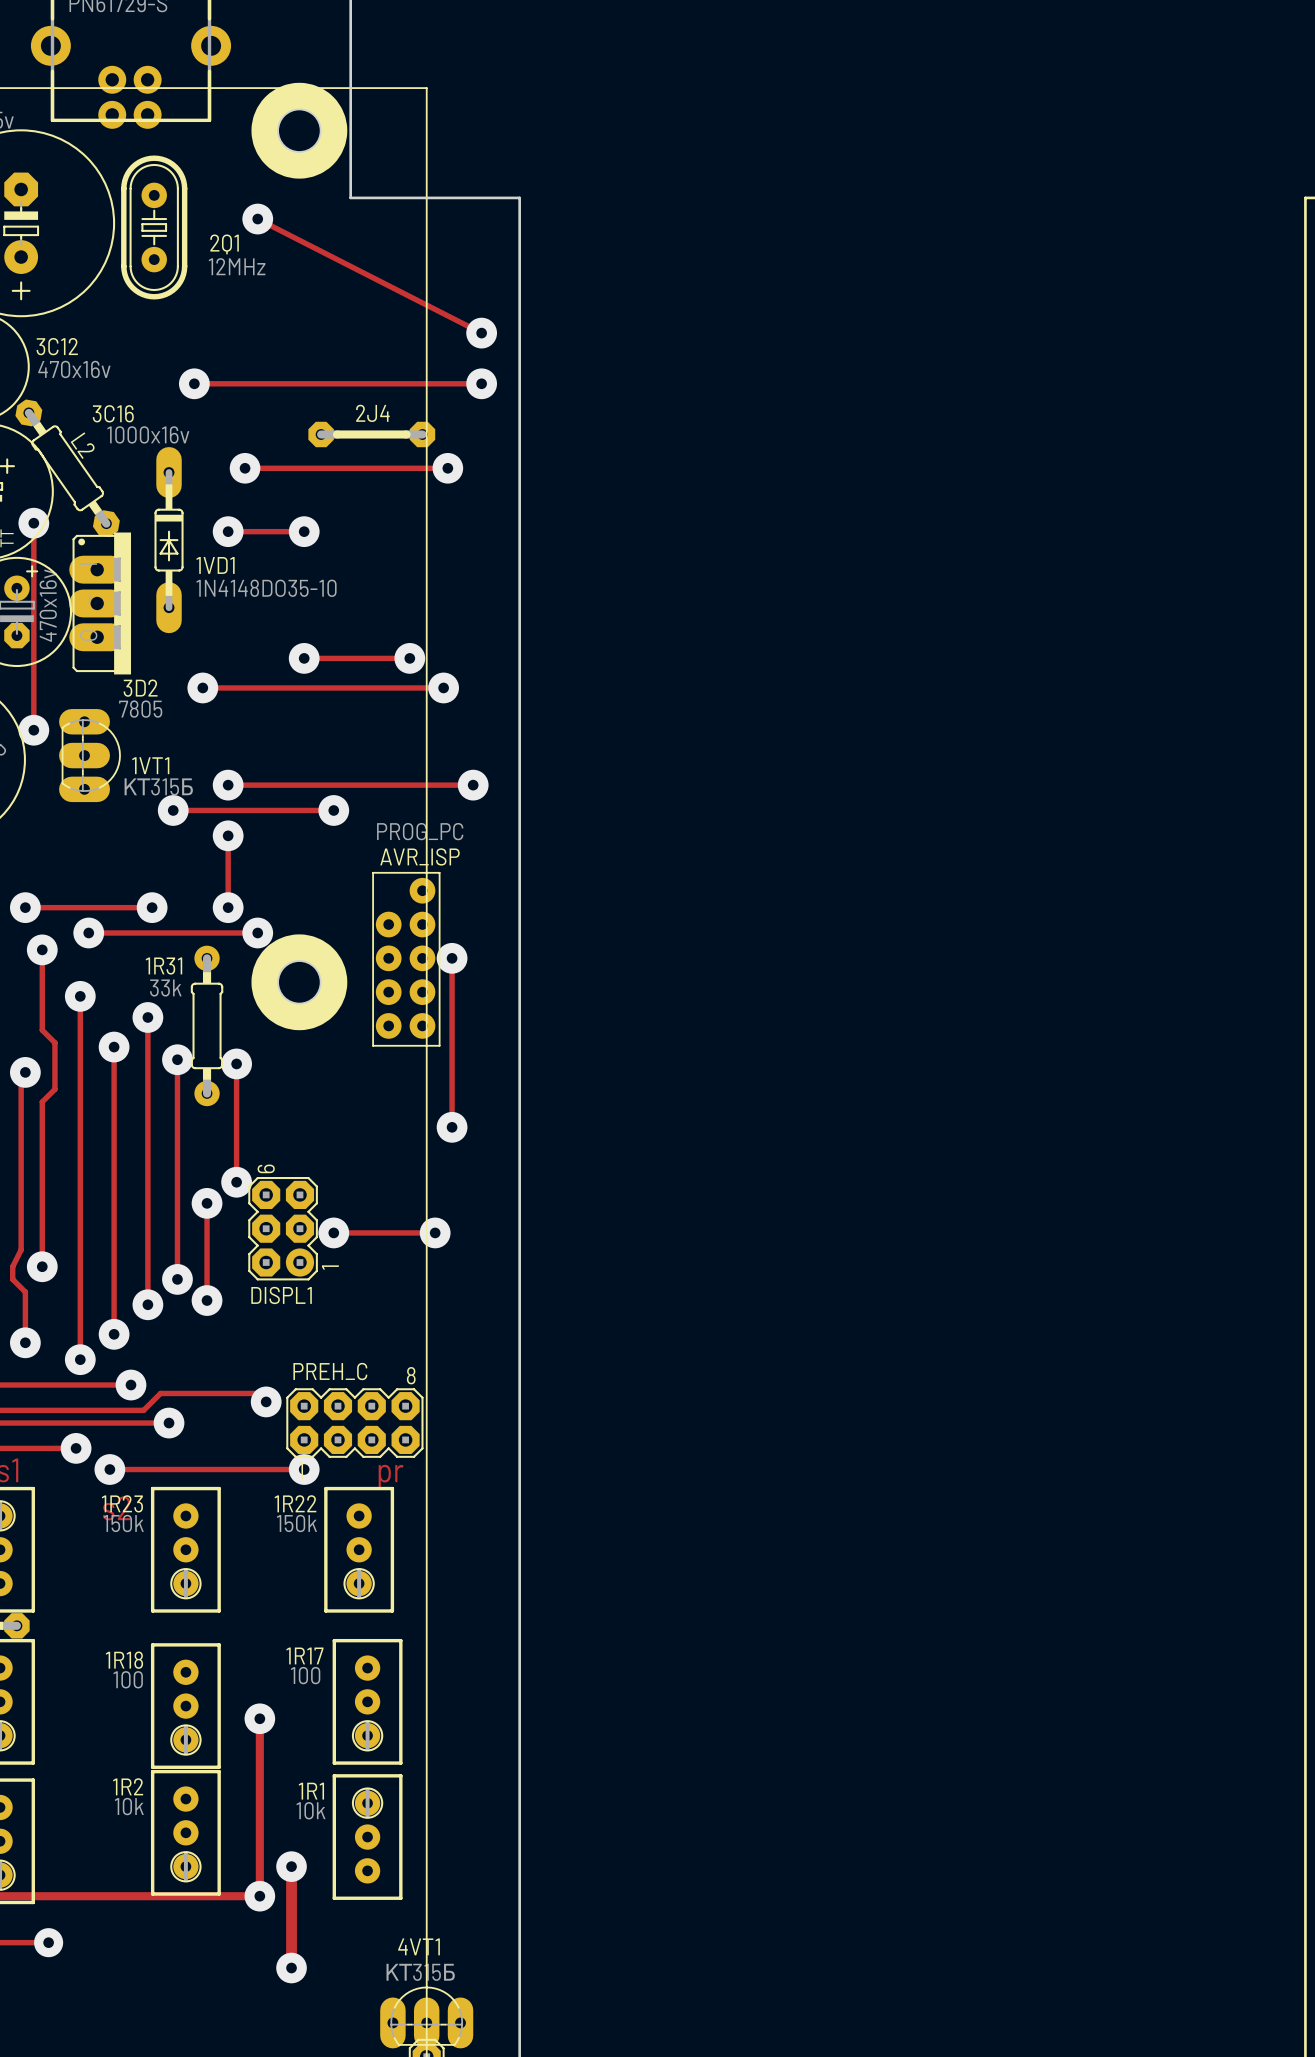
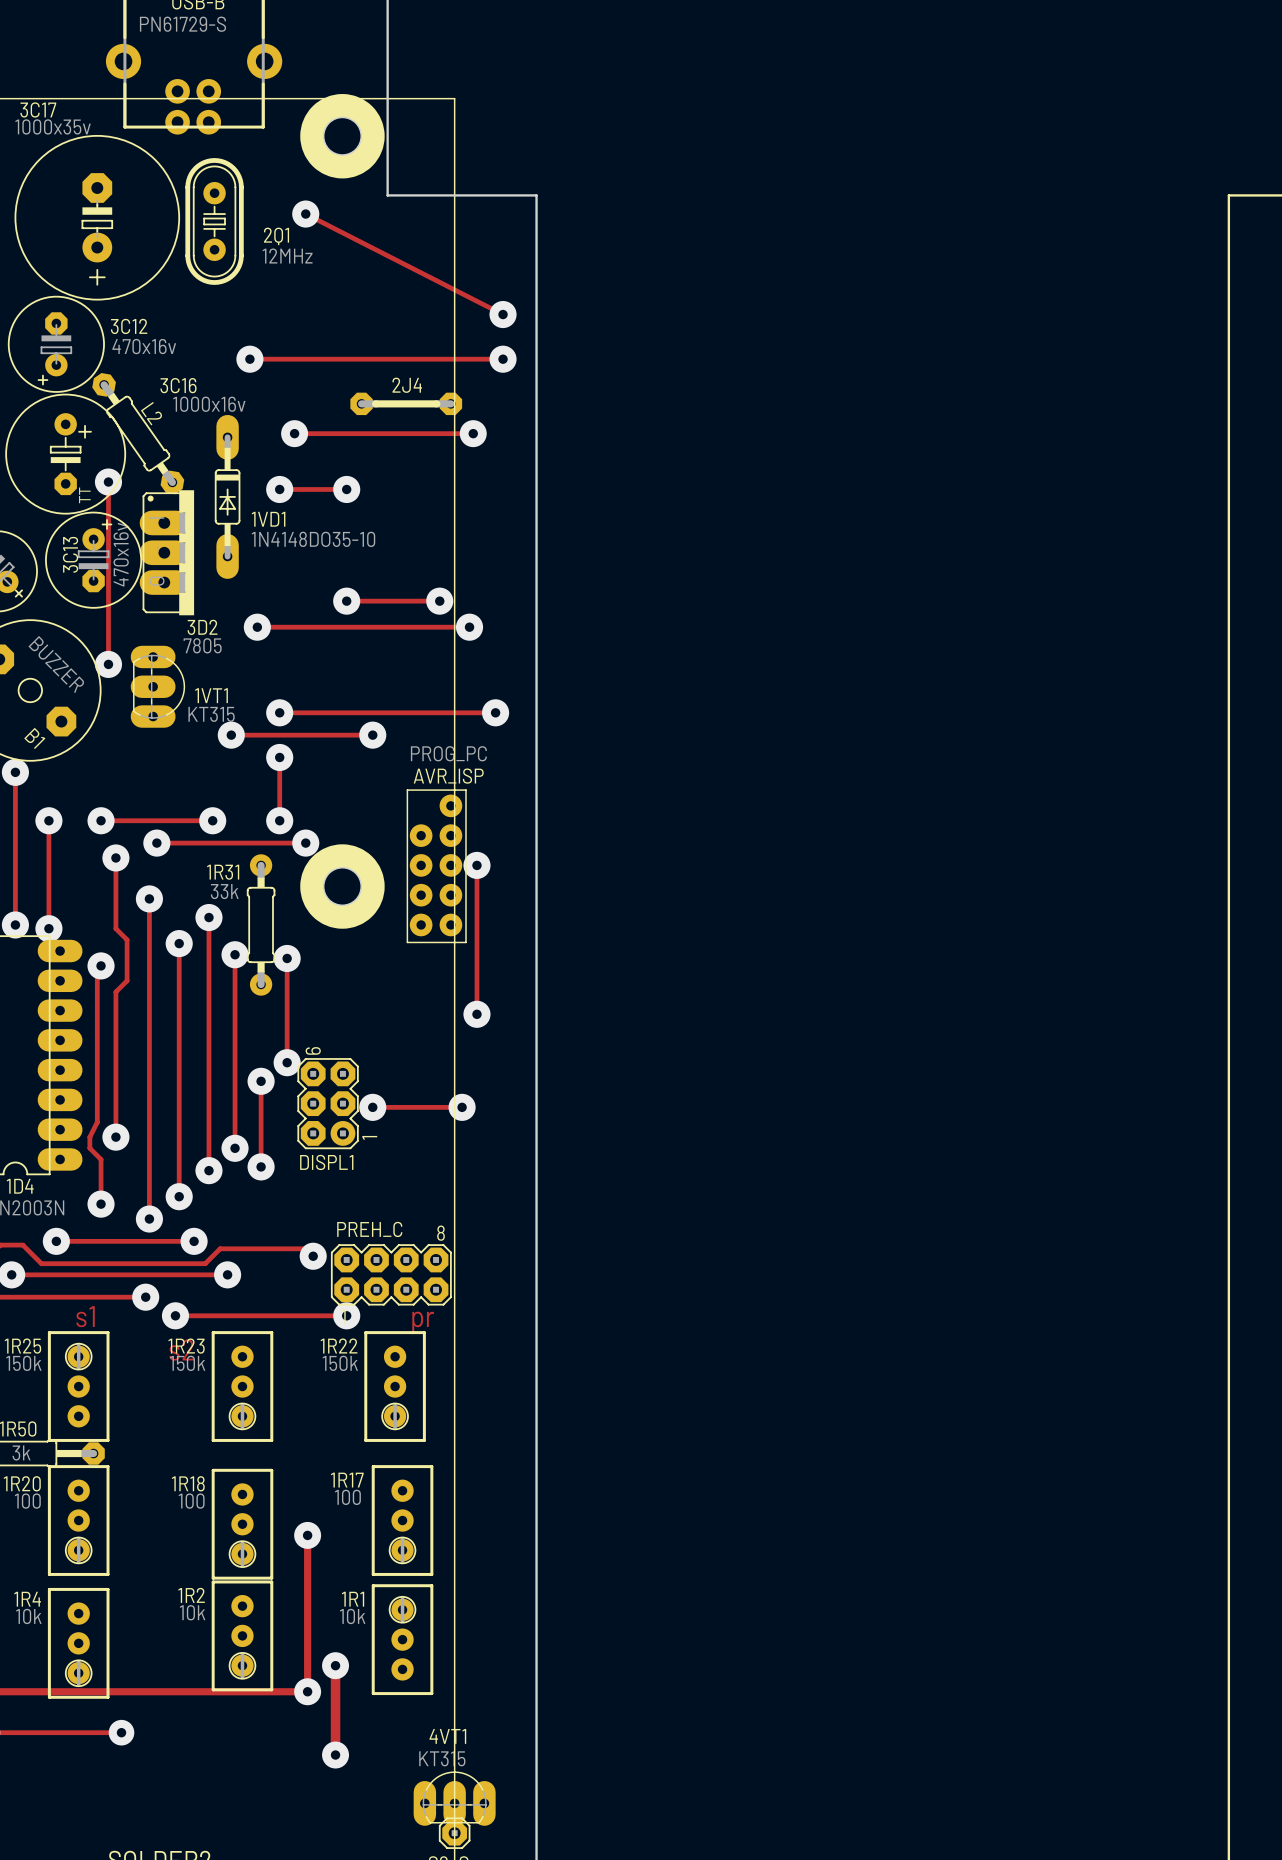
1VT1 value: КТ315Б (158, 786) -> KT315 (211, 714)
4VT1 value: КТ315Б (420, 1972) -> KT315 (442, 1758)

